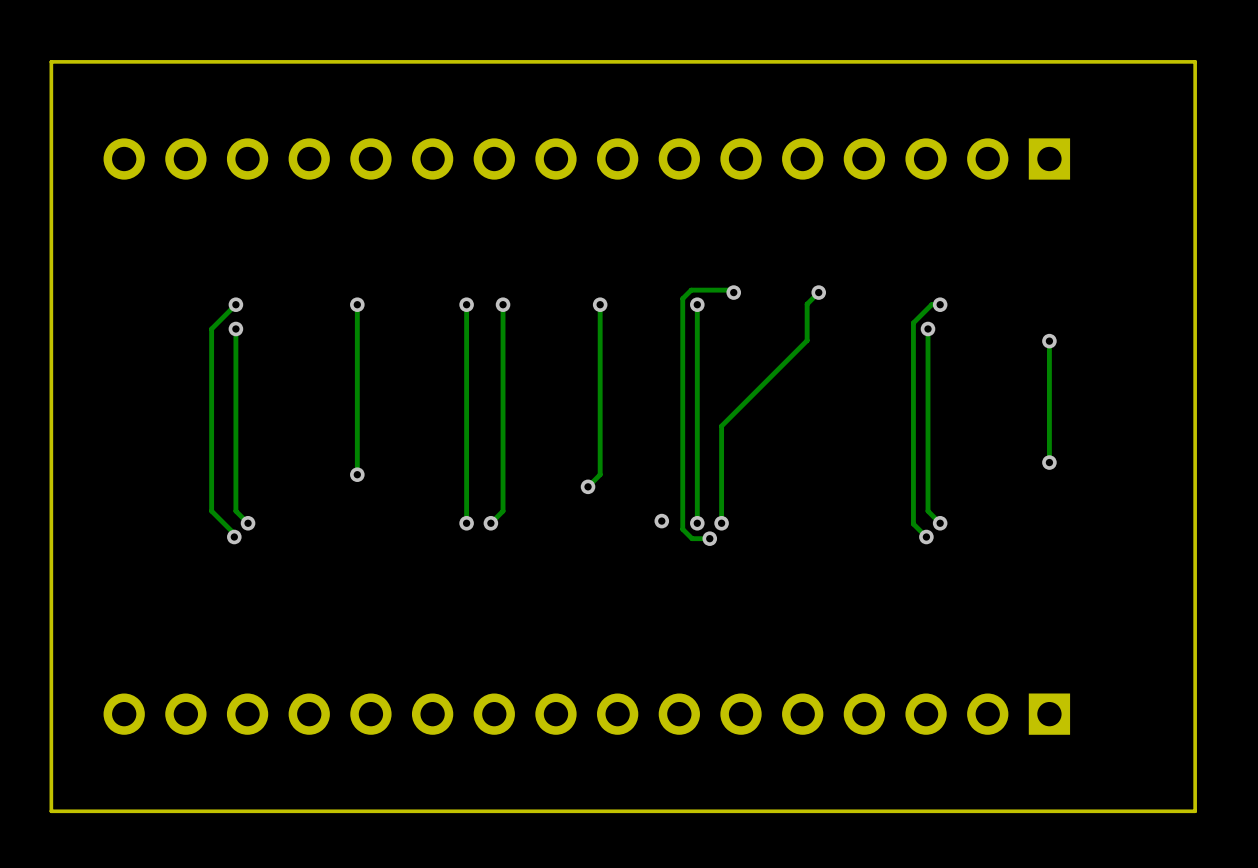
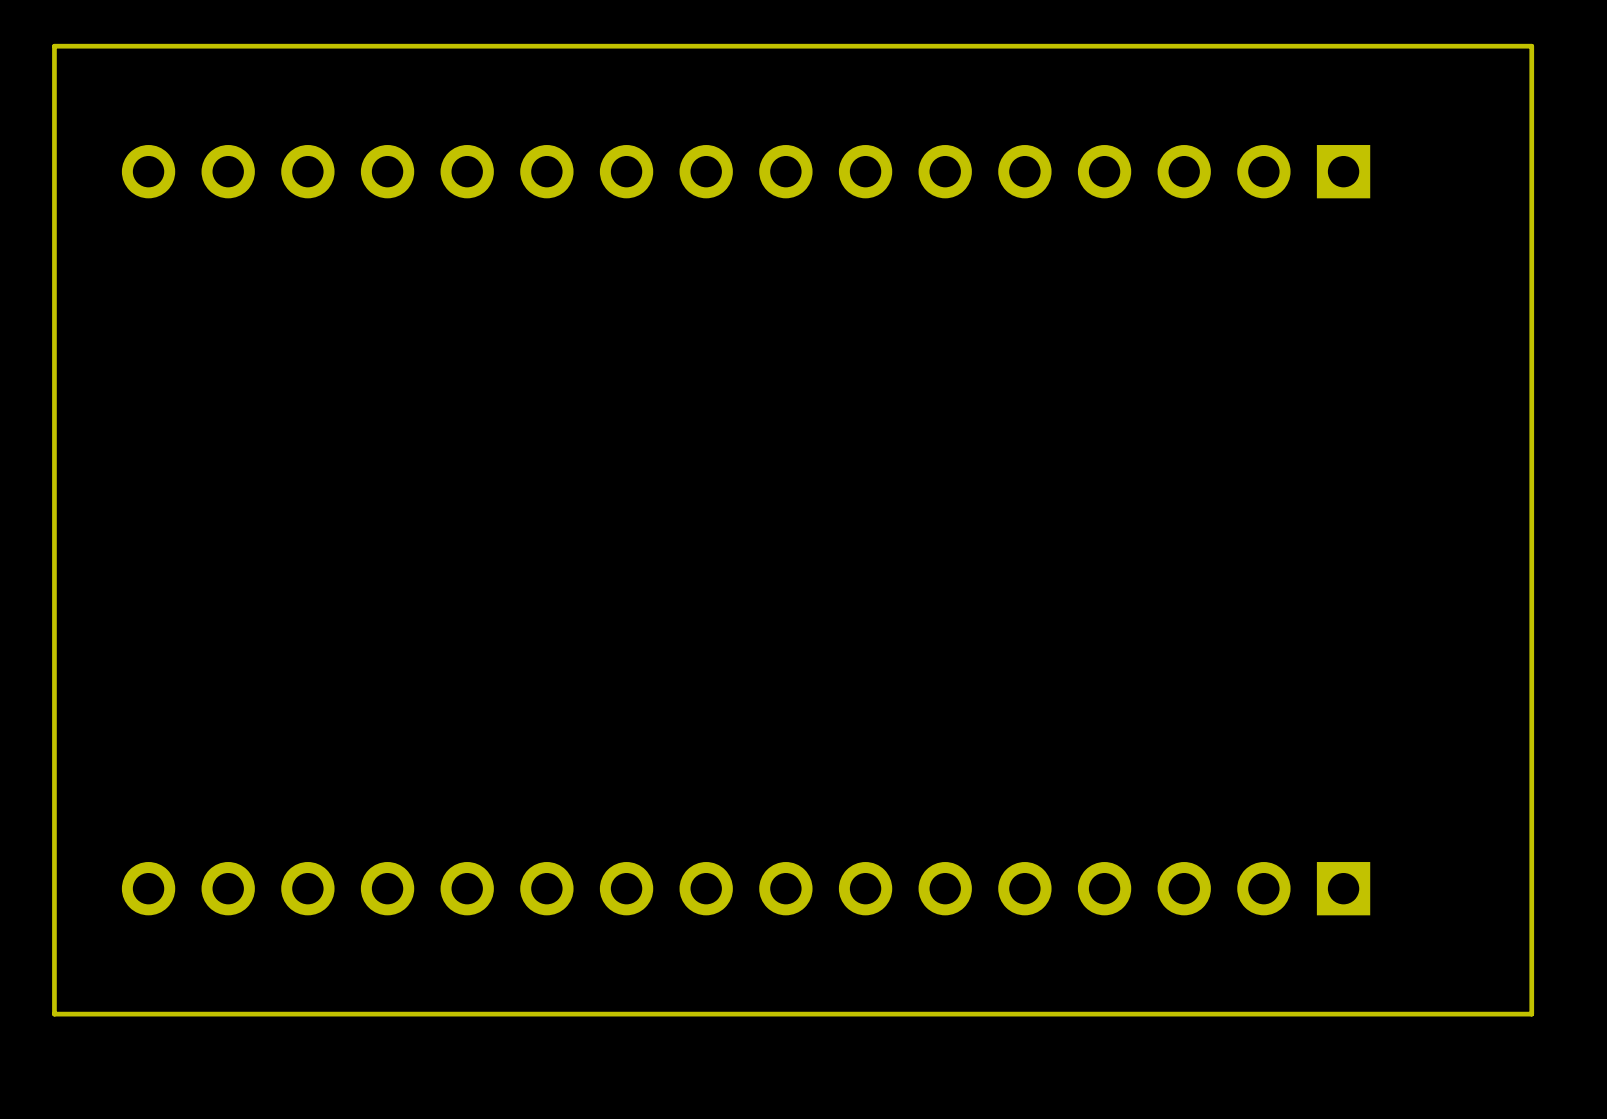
track: (733, 292) (731, 290) (691, 290) (682, 298) (682, 529) (692, 538) (709, 538) -> none
via: (733, 292) -> none
track: (818, 292) (807, 304) (807, 340) (721, 426) (721, 523) -> none
via: (818, 292) -> none
track: (235, 304) (211, 328) (211, 511) (235, 535) (234, 537) -> none
via: (235, 304) -> none
track: (357, 304) (357, 474) -> none
via: (357, 304) -> none
track: (466, 304) (466, 523) -> none
via: (466, 304) -> none
track: (503, 304) (503, 511) (490, 523) -> none
via: (503, 304) -> none
track: (600, 304) (600, 474) (588, 486) -> none
via: (600, 304) -> none
track: (697, 304) (697, 523) -> none
via: (697, 304) -> none
track: (940, 304) (931, 304) (913, 322) (913, 524) (926, 537) -> none
via: (940, 304) -> none
track: (235, 328) (235, 511) (248, 523) -> none
via: (235, 328) -> none
track: (928, 328) (928, 511) (940, 523) -> none
via: (928, 328) -> none
track: (1049, 341) (1049, 462) -> none
via: (1049, 341) -> none
via: (1049, 462) -> none
via: (357, 474) -> none
via: (588, 486) -> none
via: (661, 521) -> none
via: (248, 523) -> none
via: (466, 523) -> none
via: (490, 523) -> none
via: (697, 523) -> none
via: (721, 523) -> none
via: (940, 523) -> none
via: (234, 537) -> none
via: (926, 537) -> none
via: (709, 538) -> none

